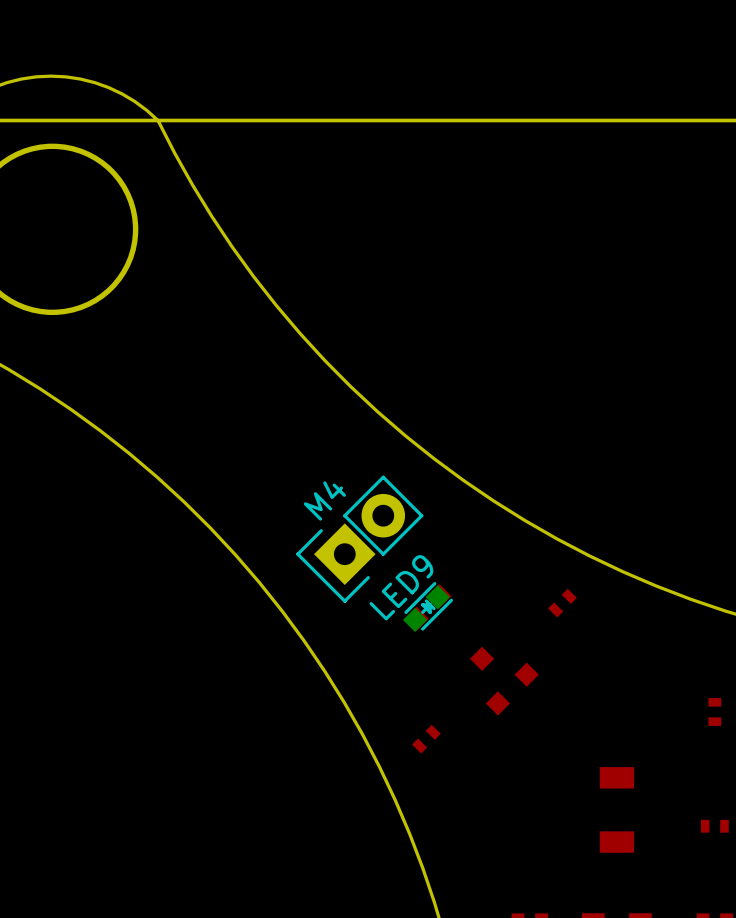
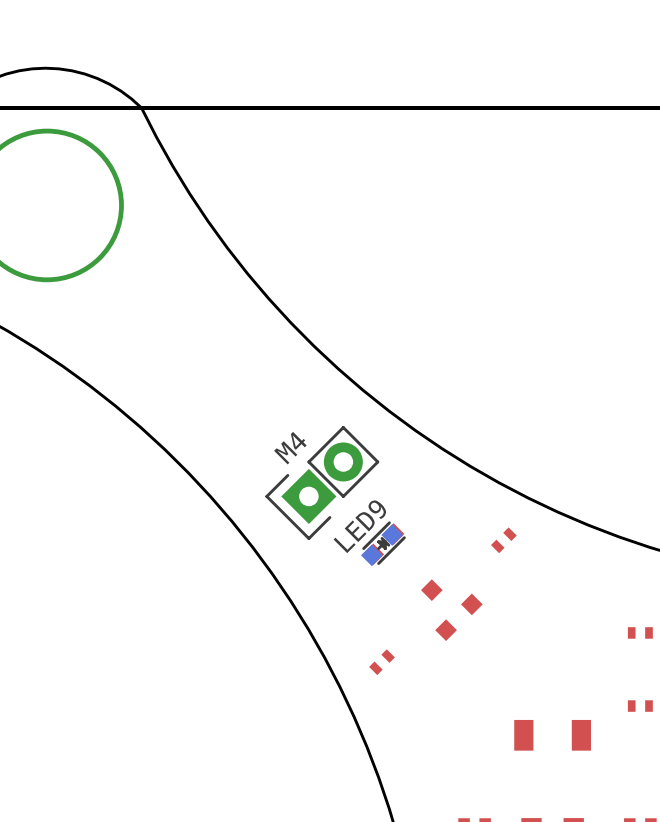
part rotation: 0° (714, 711) -> 90° clockwise (640, 632)
part rotation: 0° (616, 809) -> 90° clockwise (552, 735)
part position: (714, 826) -> (640, 706)

